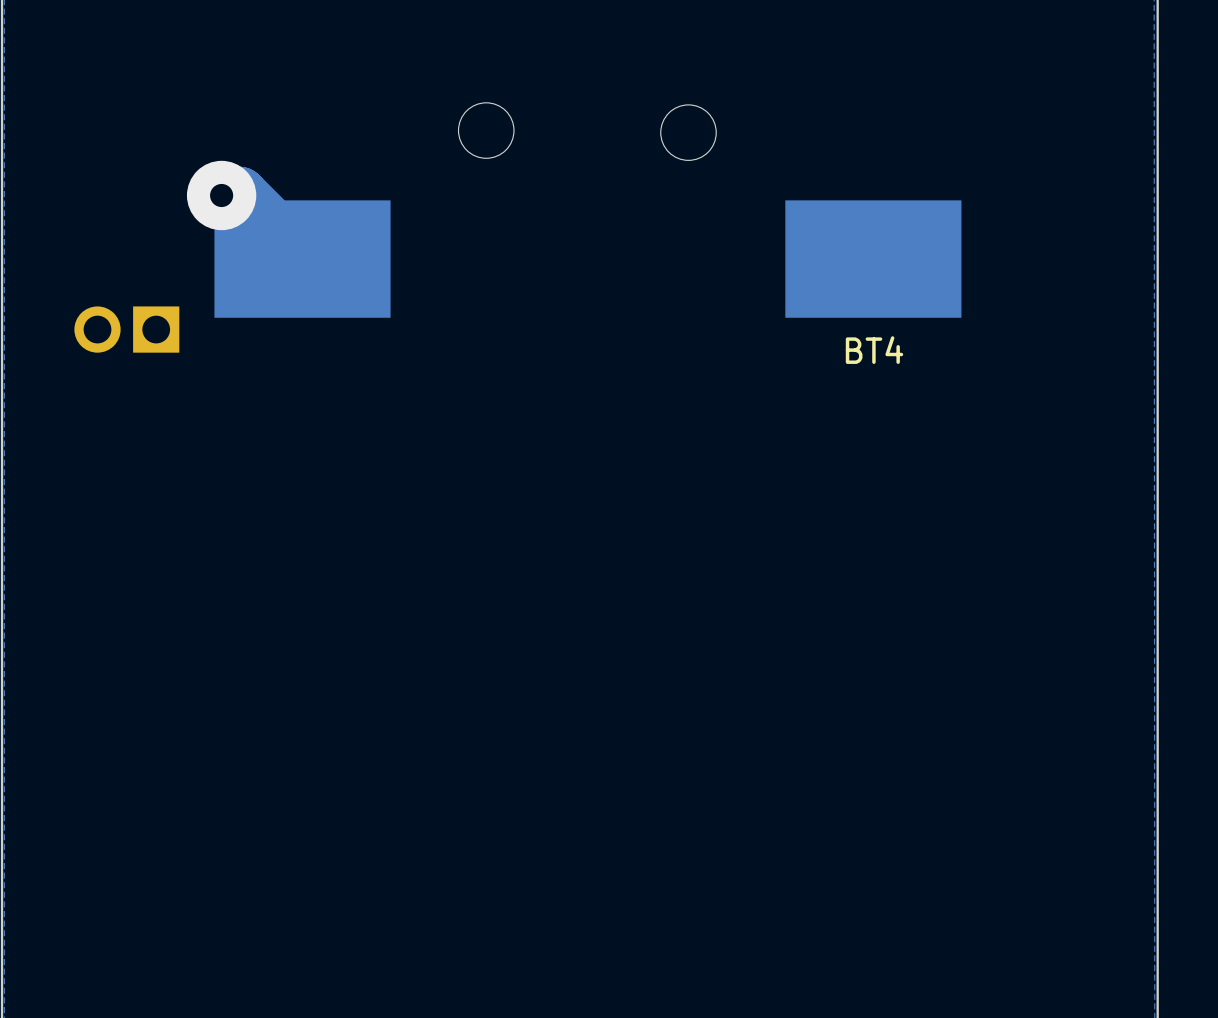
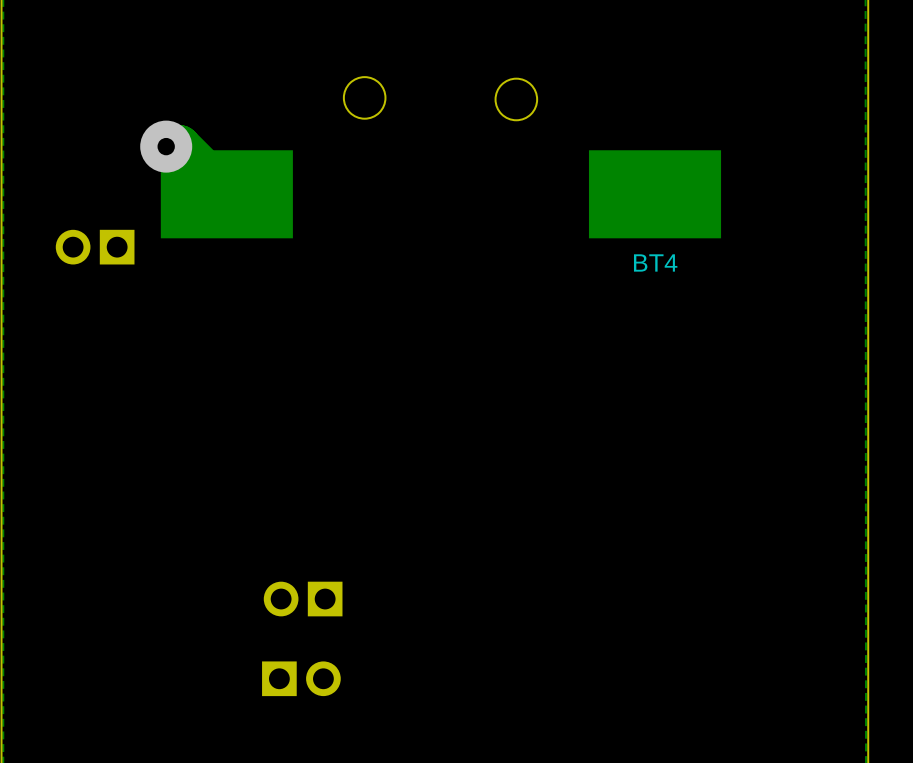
part: none -> (303, 599)
part: none -> (301, 678)

